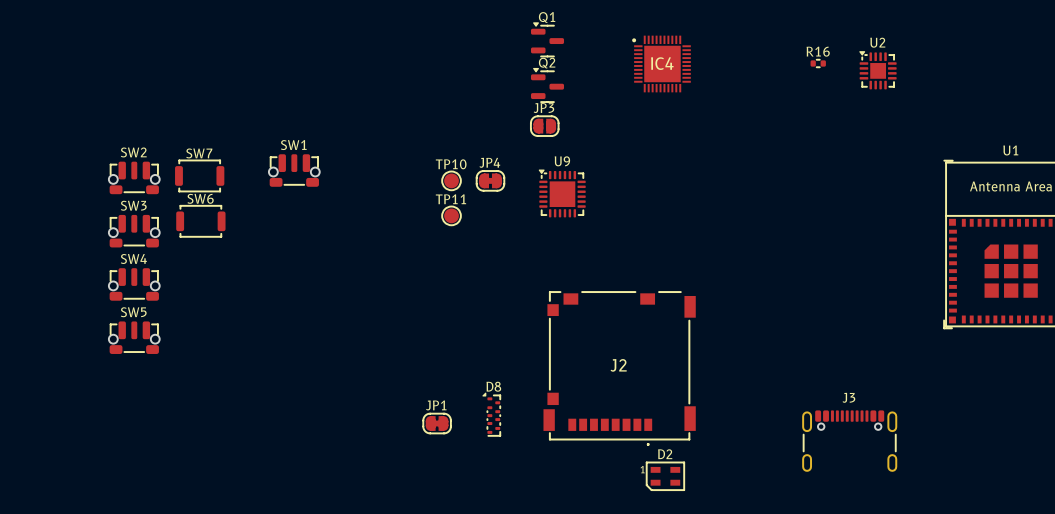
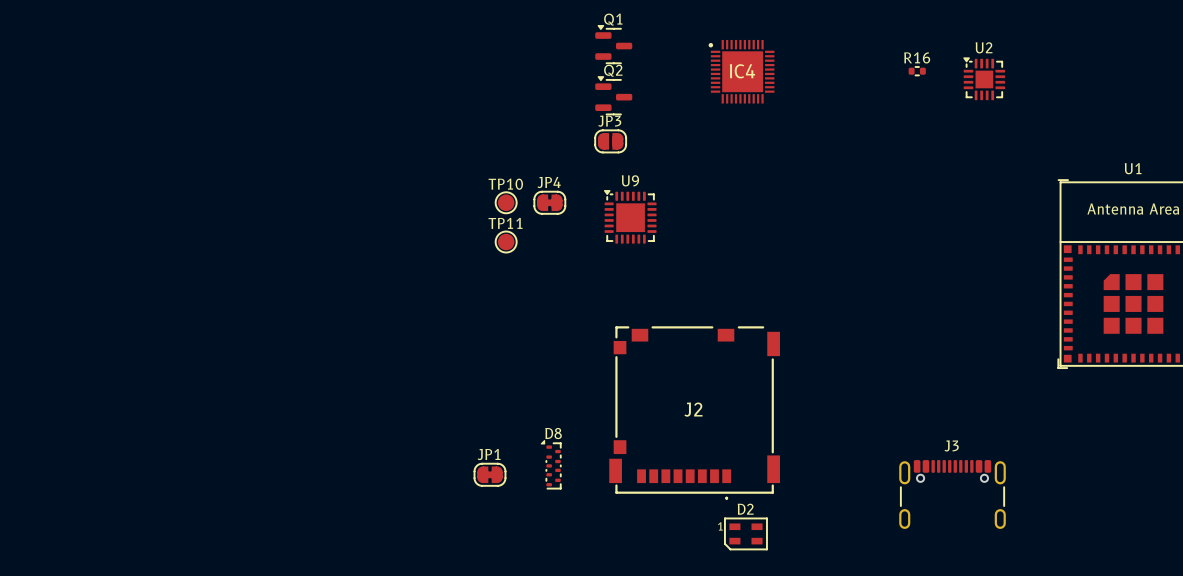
SW1: (294, 170) -> none
SW7: (199, 175) -> none
SW2: (134, 177) -> none
SW6: (200, 221) -> none
SW3: (134, 231) -> none
SW4: (134, 284) -> none
SW5: (134, 337) -> none

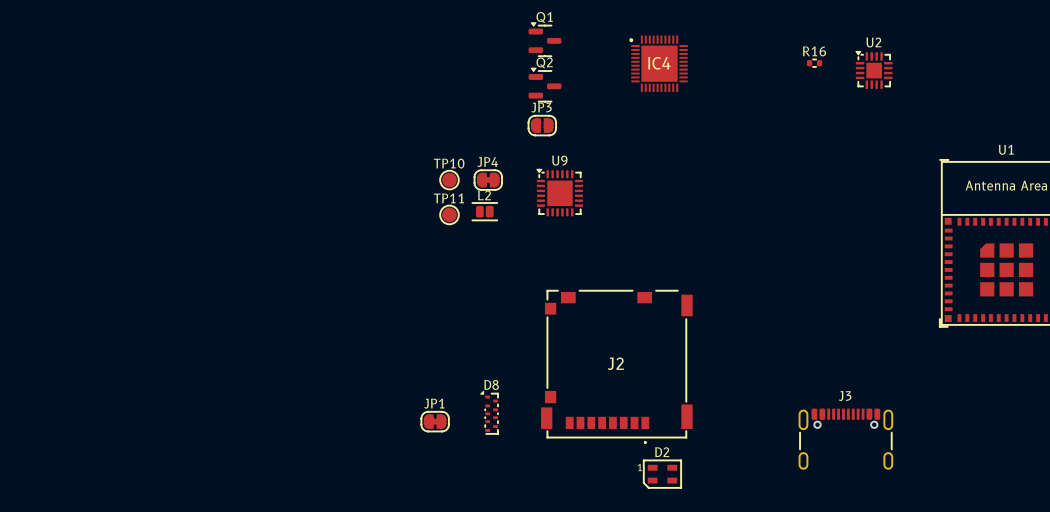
L2: none -> (484, 211)

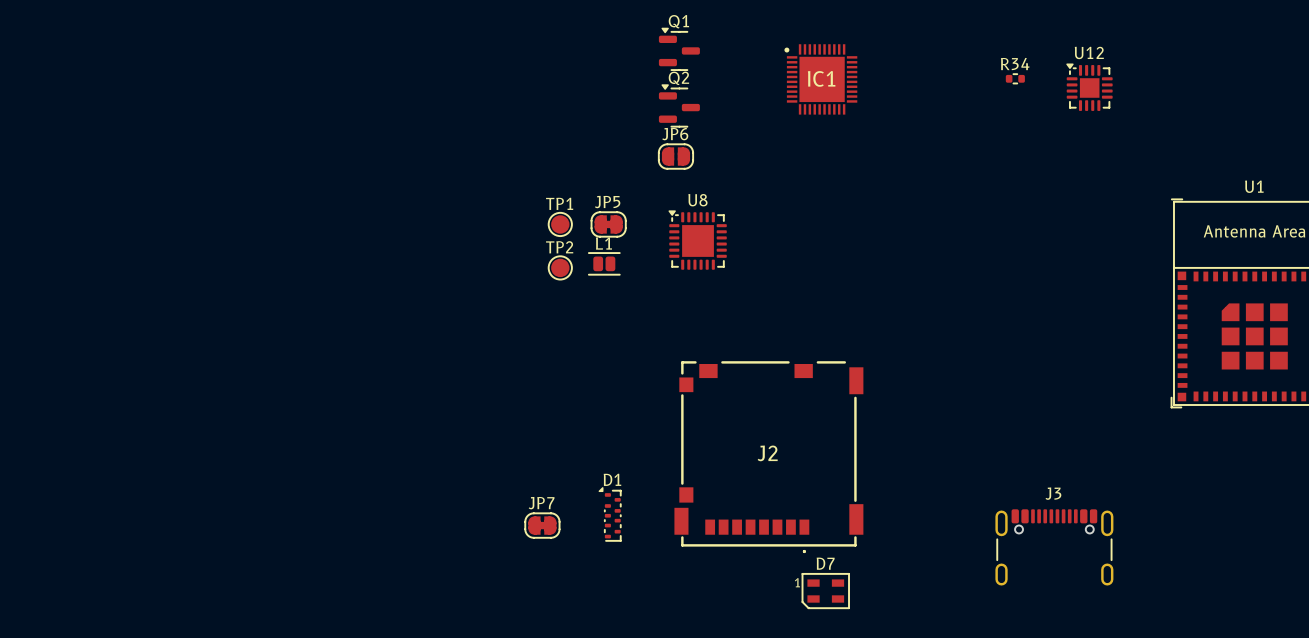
U2 name: U2 (873, 42) -> U12 (1089, 52)
R16 name: R16 (814, 51) -> R34 (1015, 64)
IC4 name: IC4 (659, 63) -> IC1 (821, 78)
JP3 name: JP3 (541, 107) -> JP6 (675, 134)
U9 name: U9 (559, 160) -> U8 (697, 200)
JP4 name: JP4 (487, 162) -> JP5 (607, 202)
TP10 name: TP10 (449, 163) -> TP1 (559, 203)
L2 name: L2 (484, 195) -> L1 (603, 243)
TP11 name: TP11 (448, 198) -> TP2 (559, 247)
D8 name: D8 (491, 384) -> D1 (612, 479)
JP1 name: JP1 (434, 403) -> JP7 (541, 503)
D2 name: D2 (662, 452) -> D7 (825, 563)

